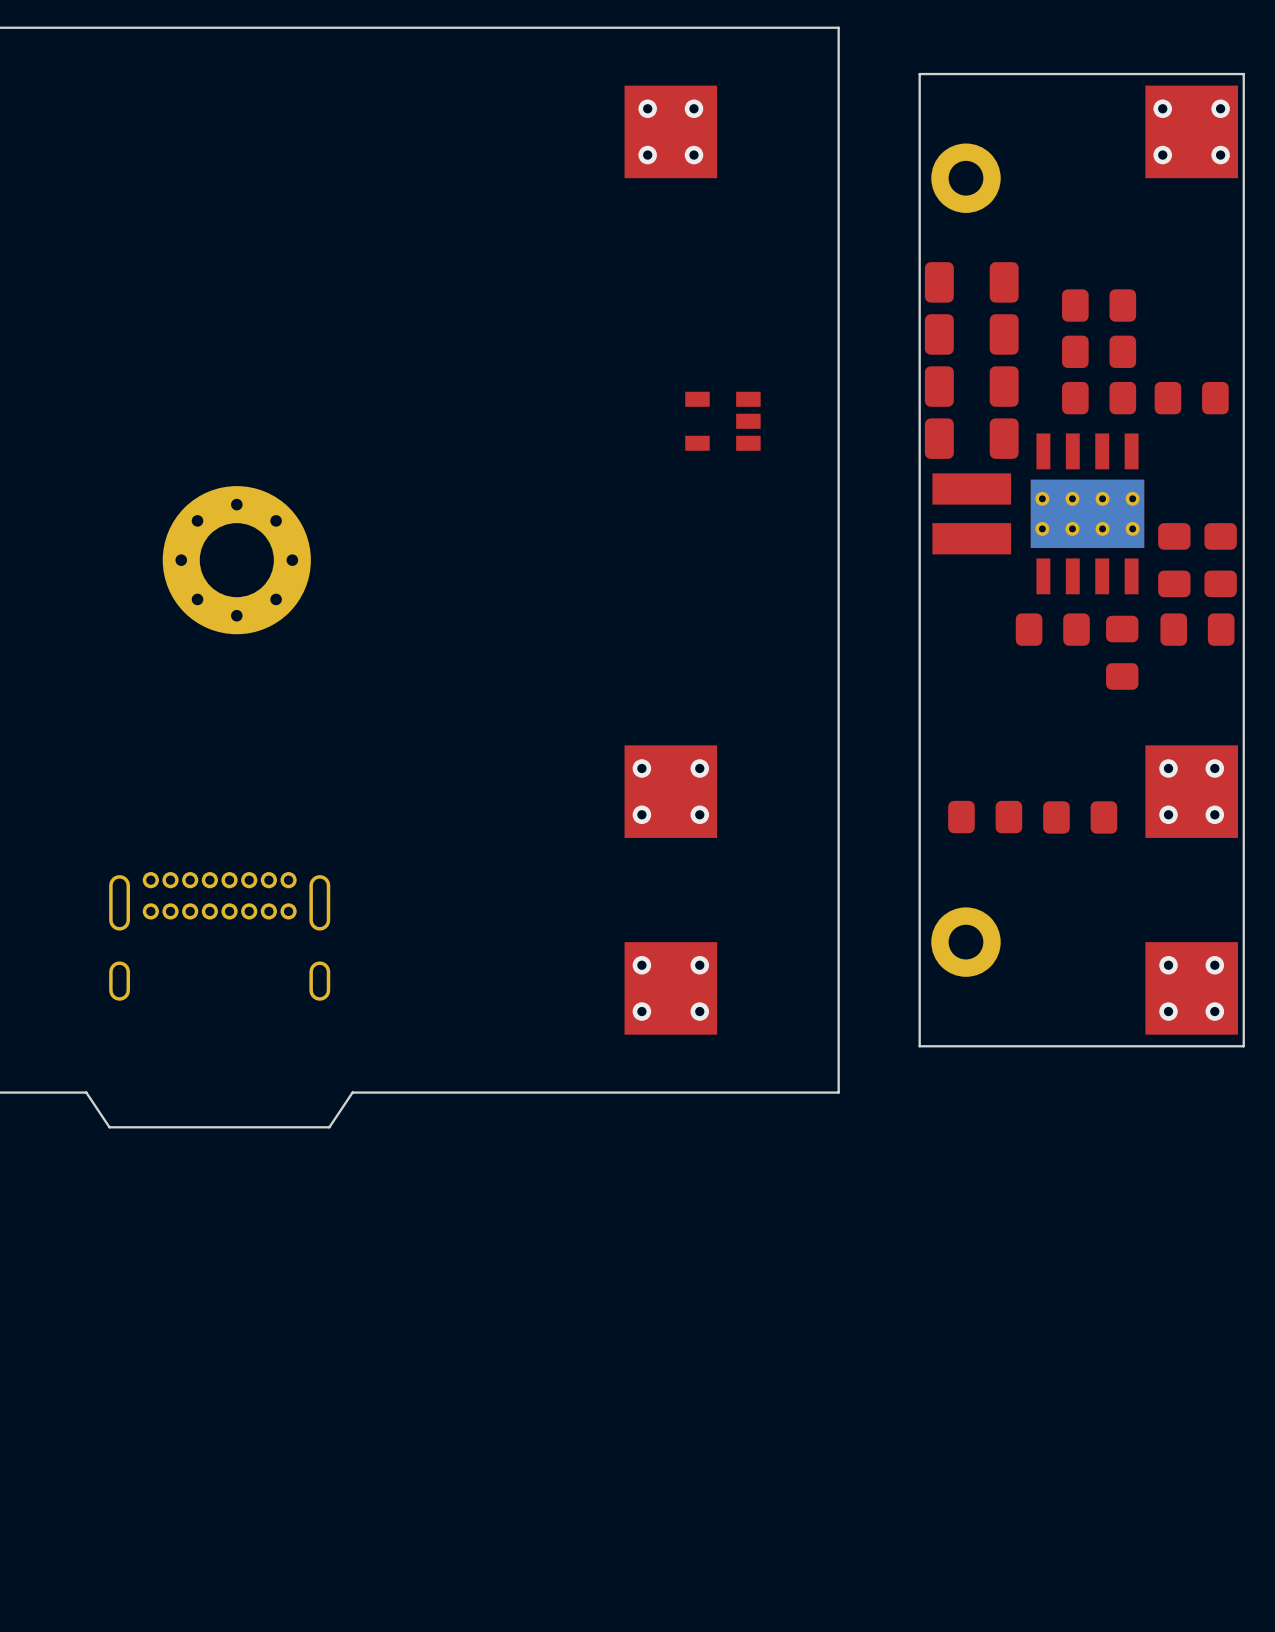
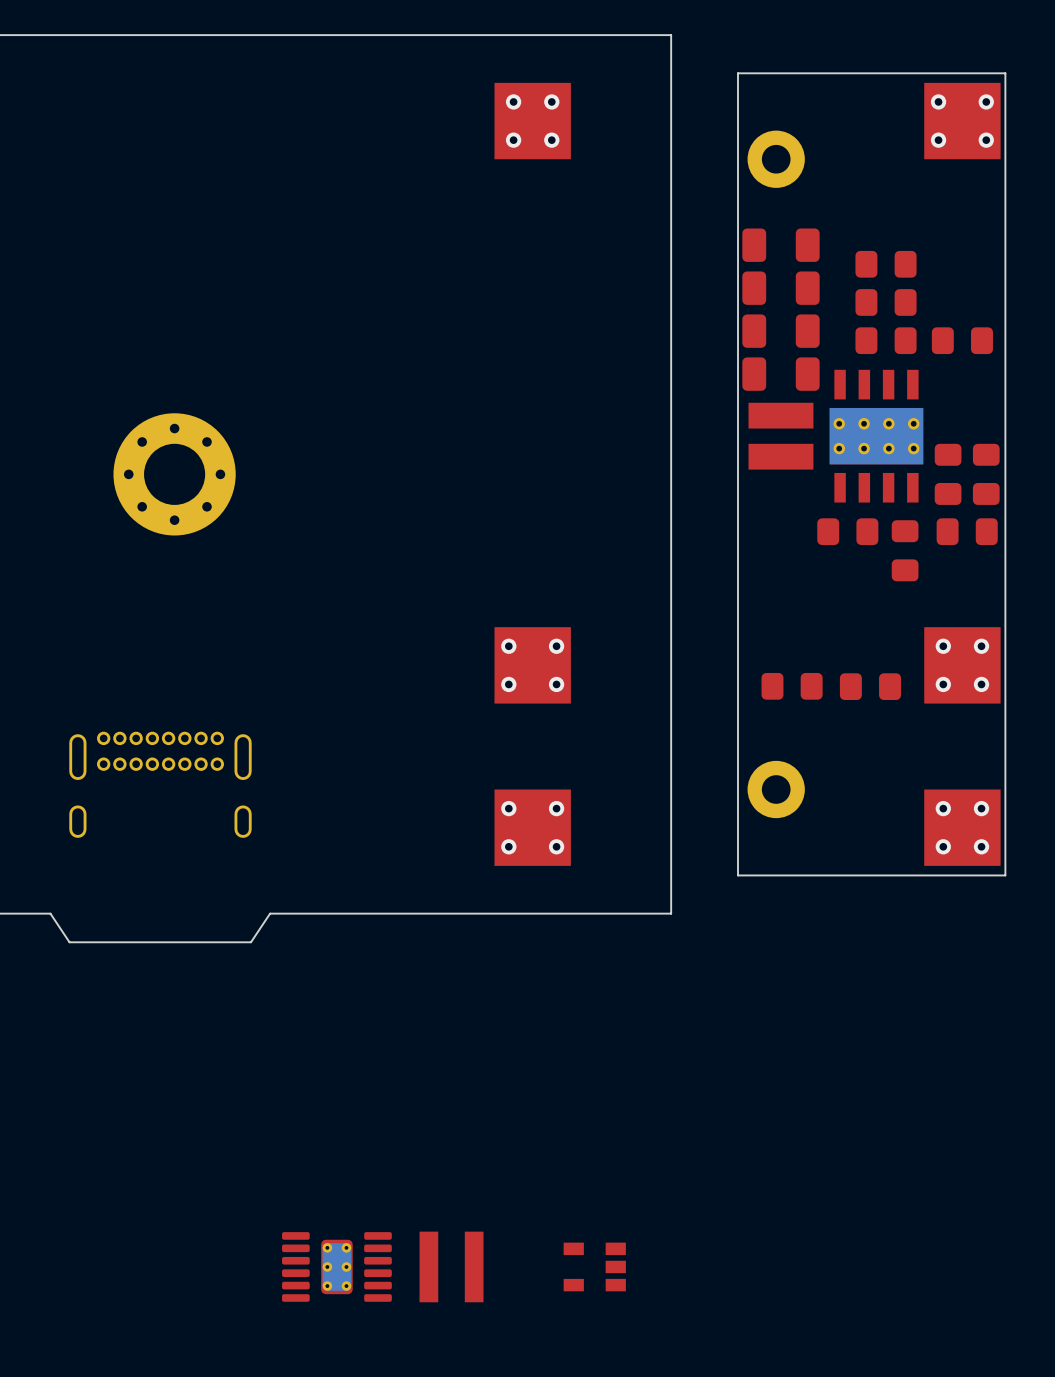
part: (722, 421) -> none
part: none -> (336, 1266)
part: none -> (451, 1266)
part: none -> (594, 1266)

